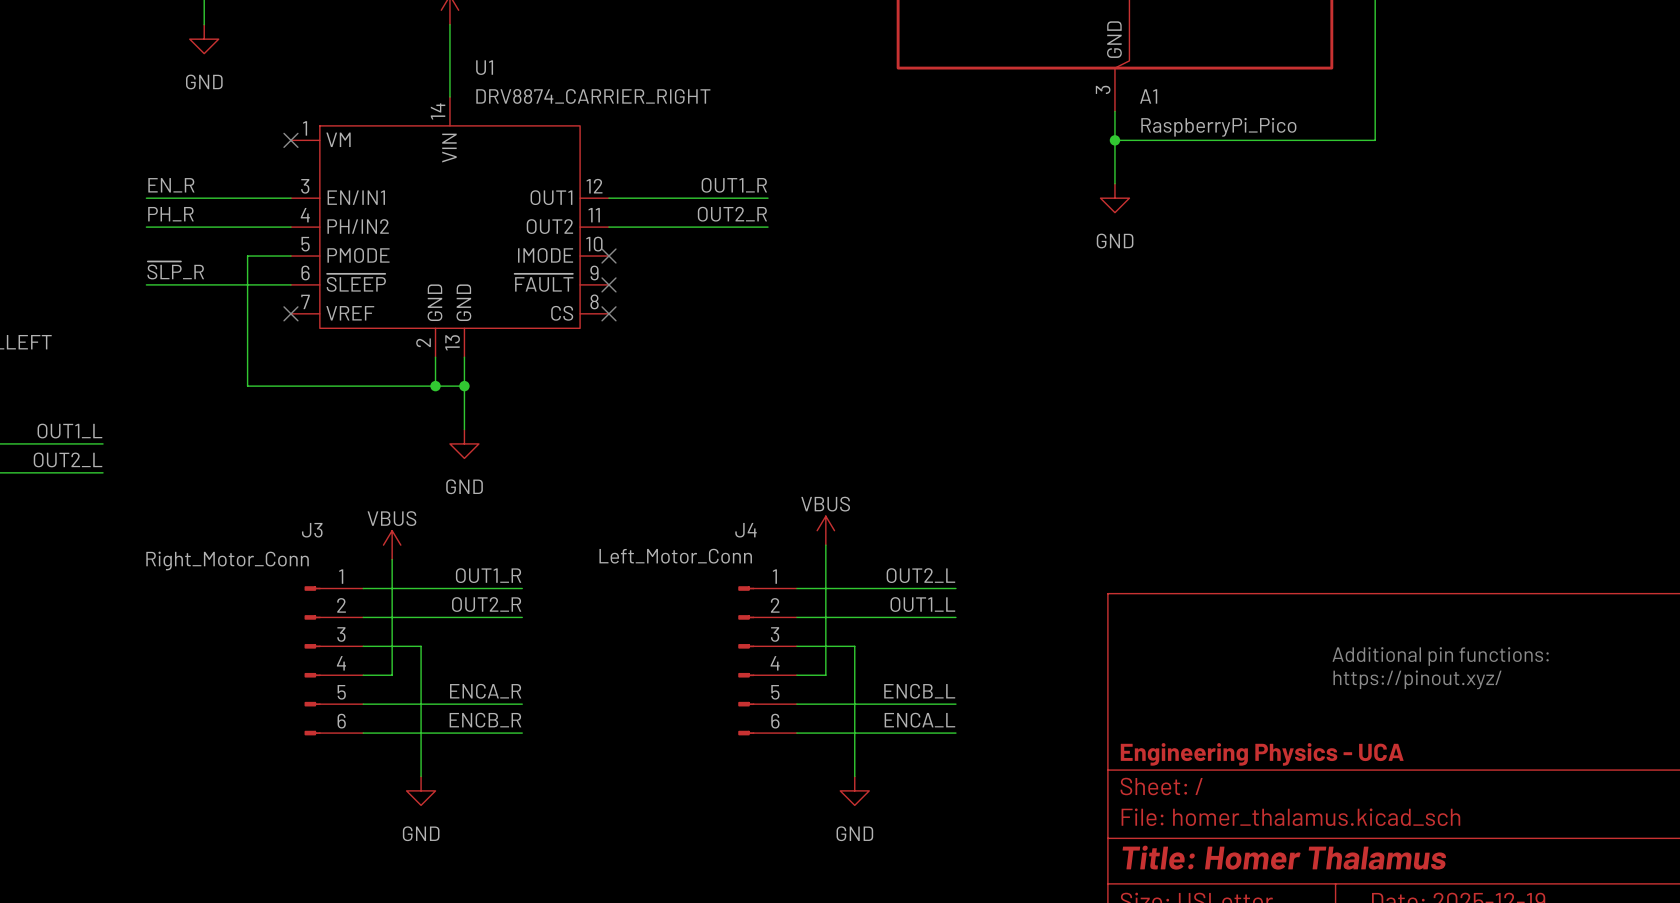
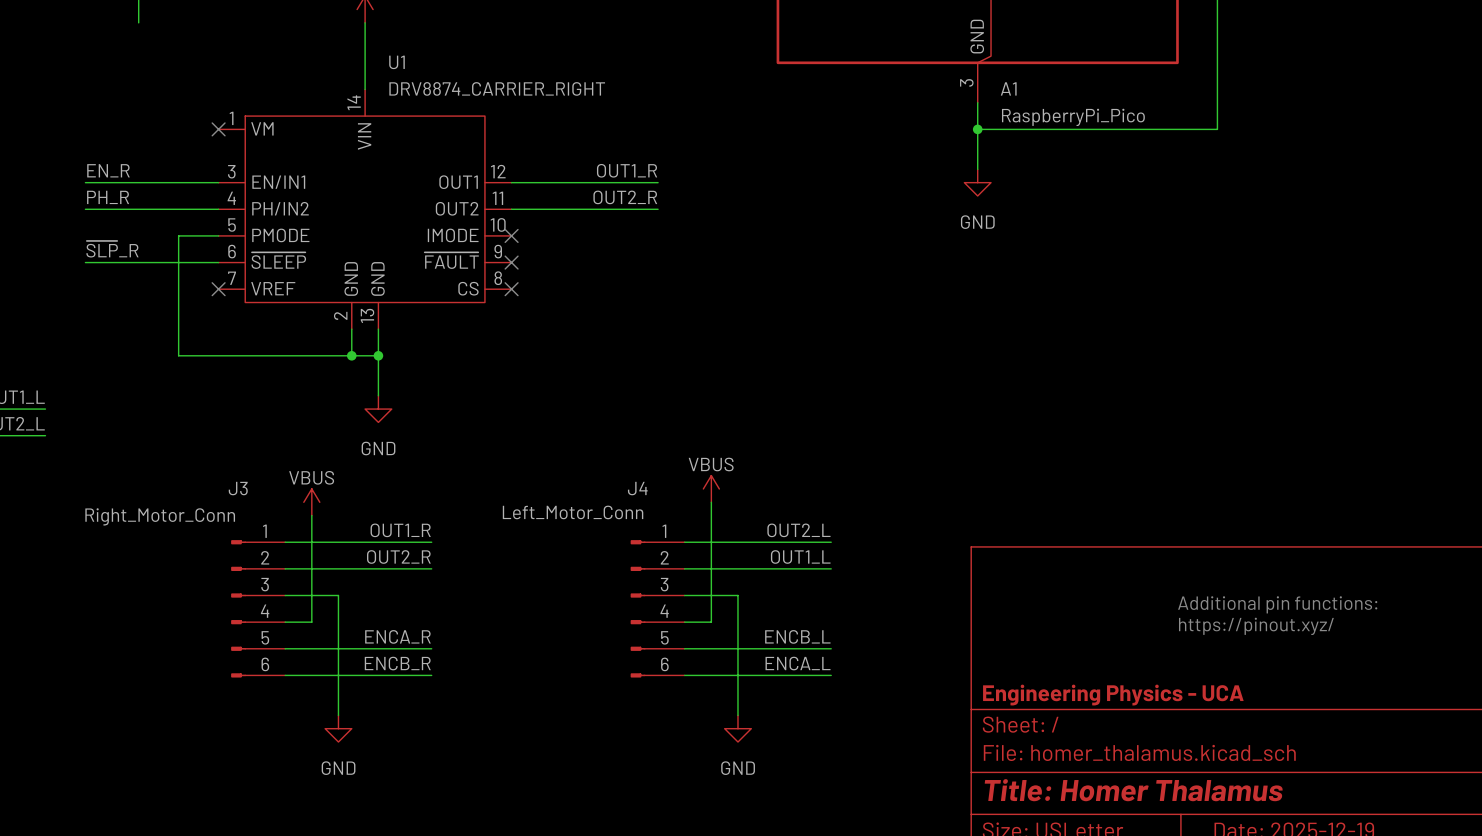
power symbol: GND (204, 39) -> none

